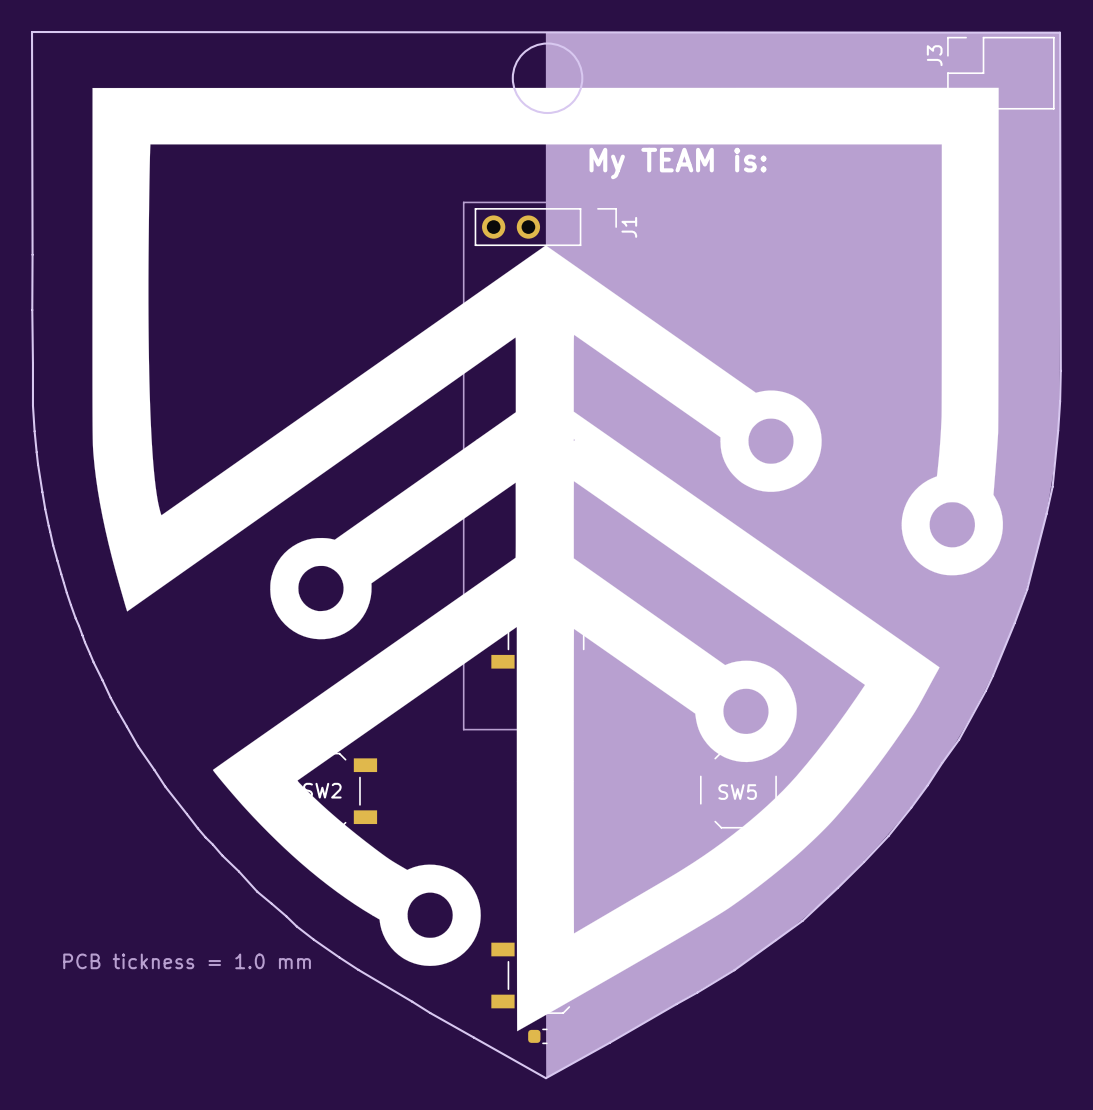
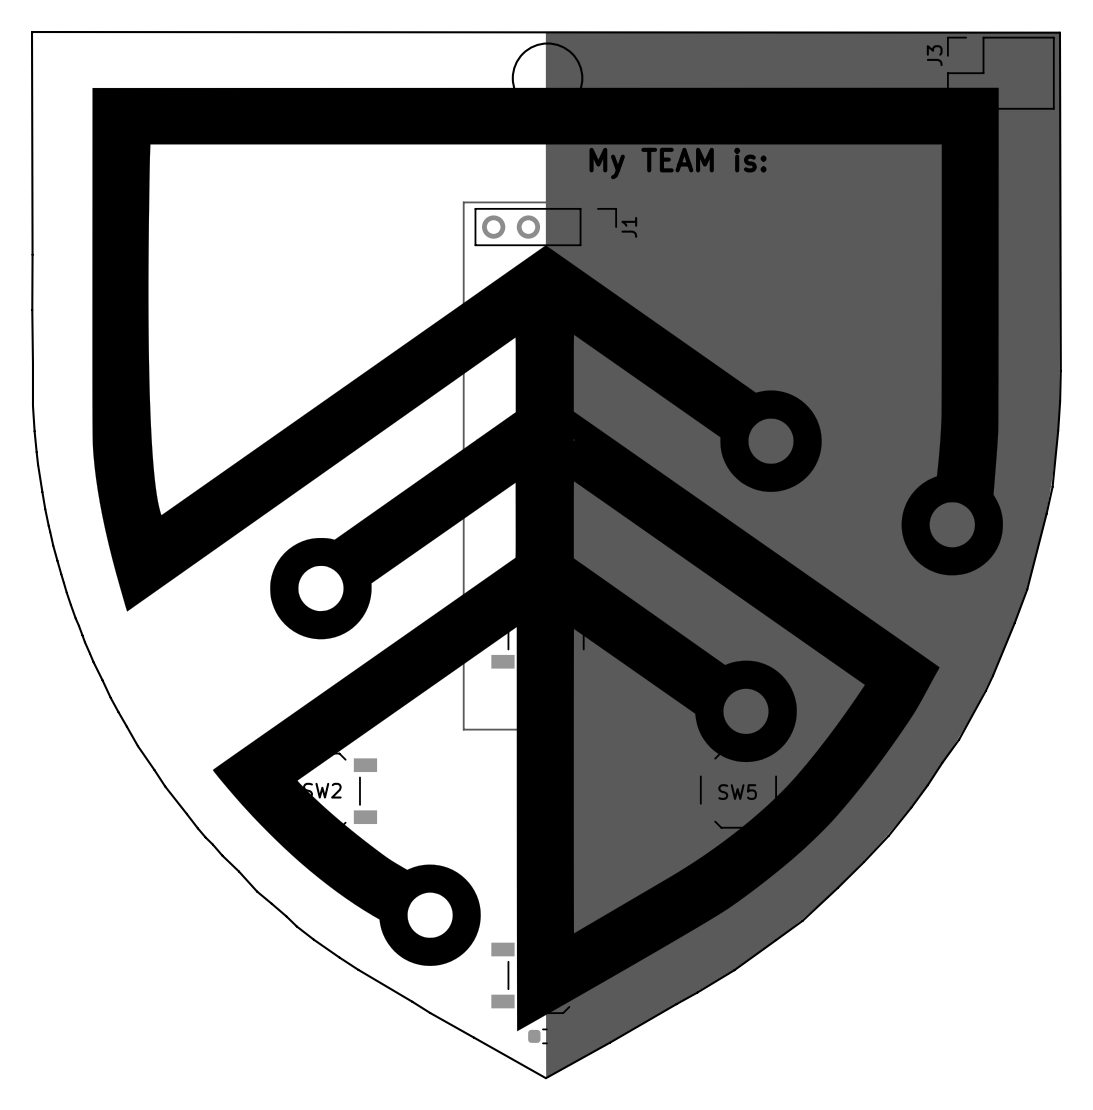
text: PCB tickness = 1.0 mm (187, 961) -> none

